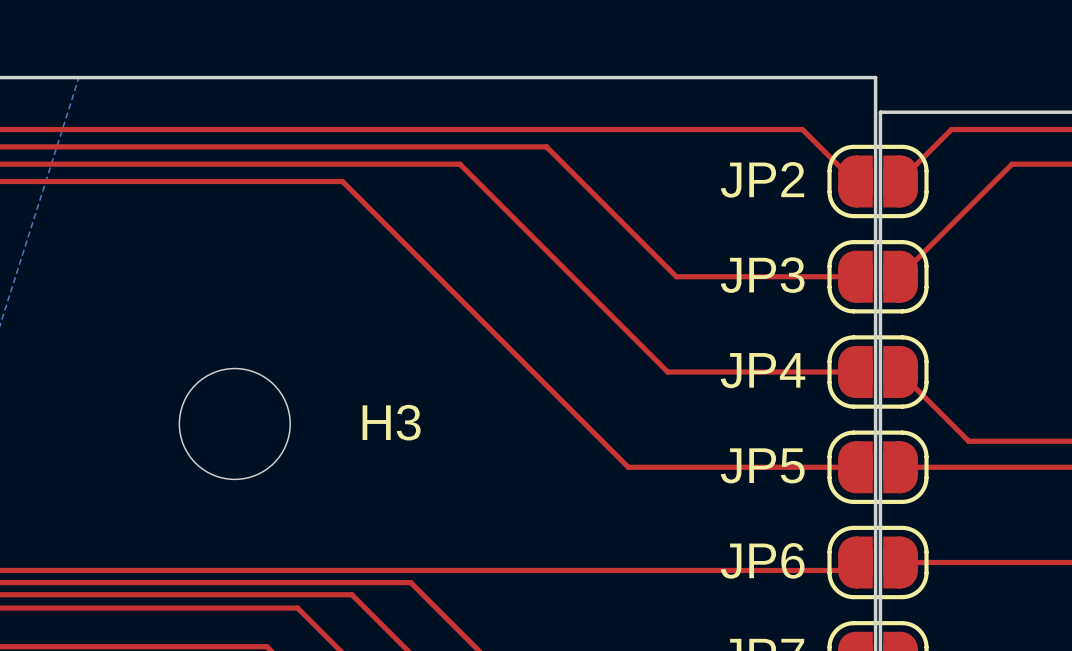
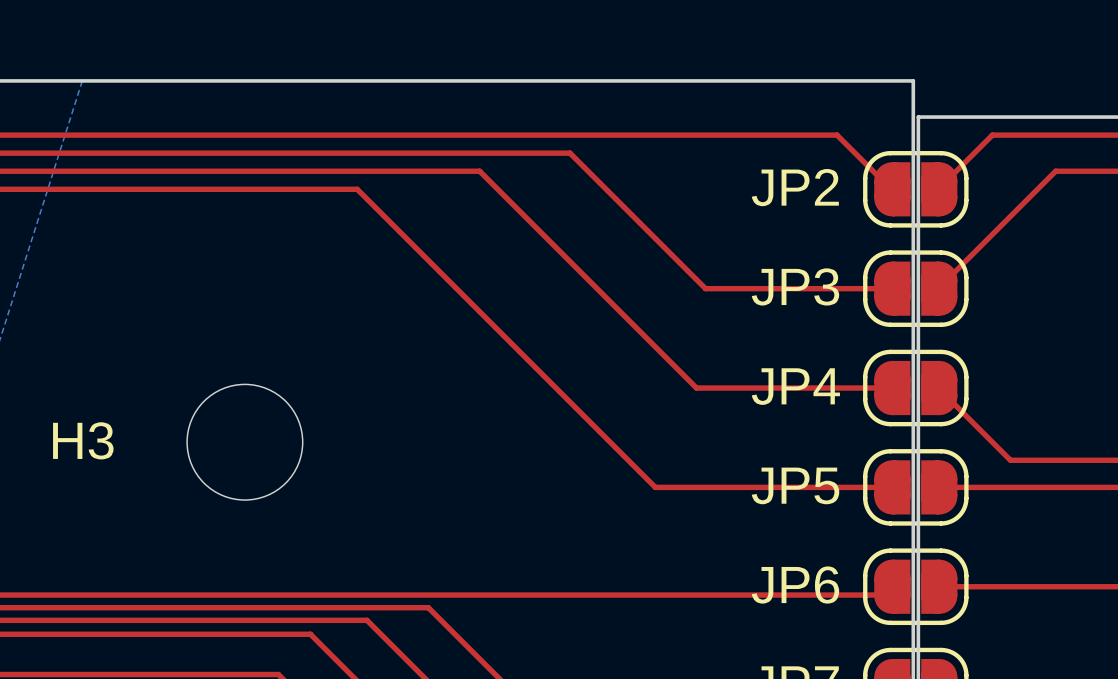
H3 name position: H3 (391, 422) -> H3 (83, 440)

